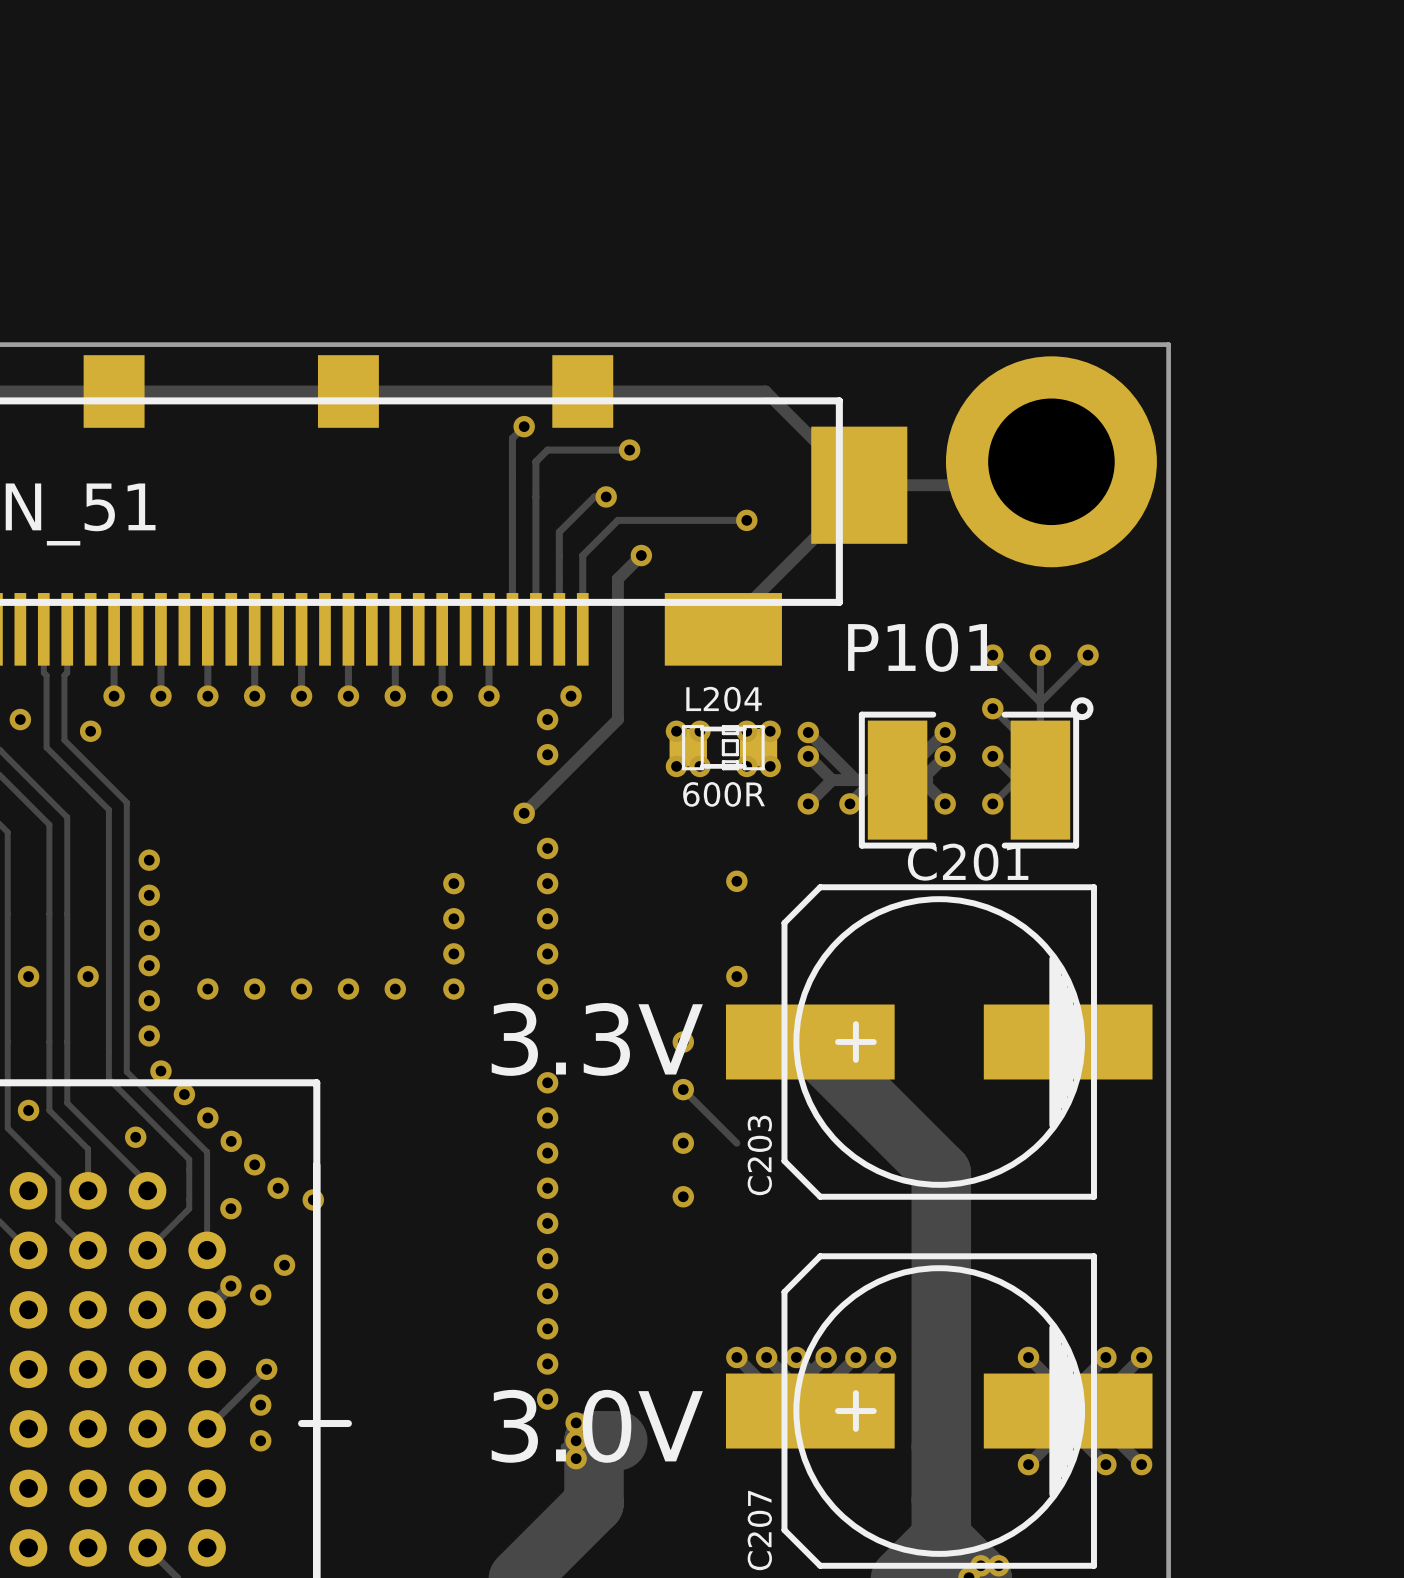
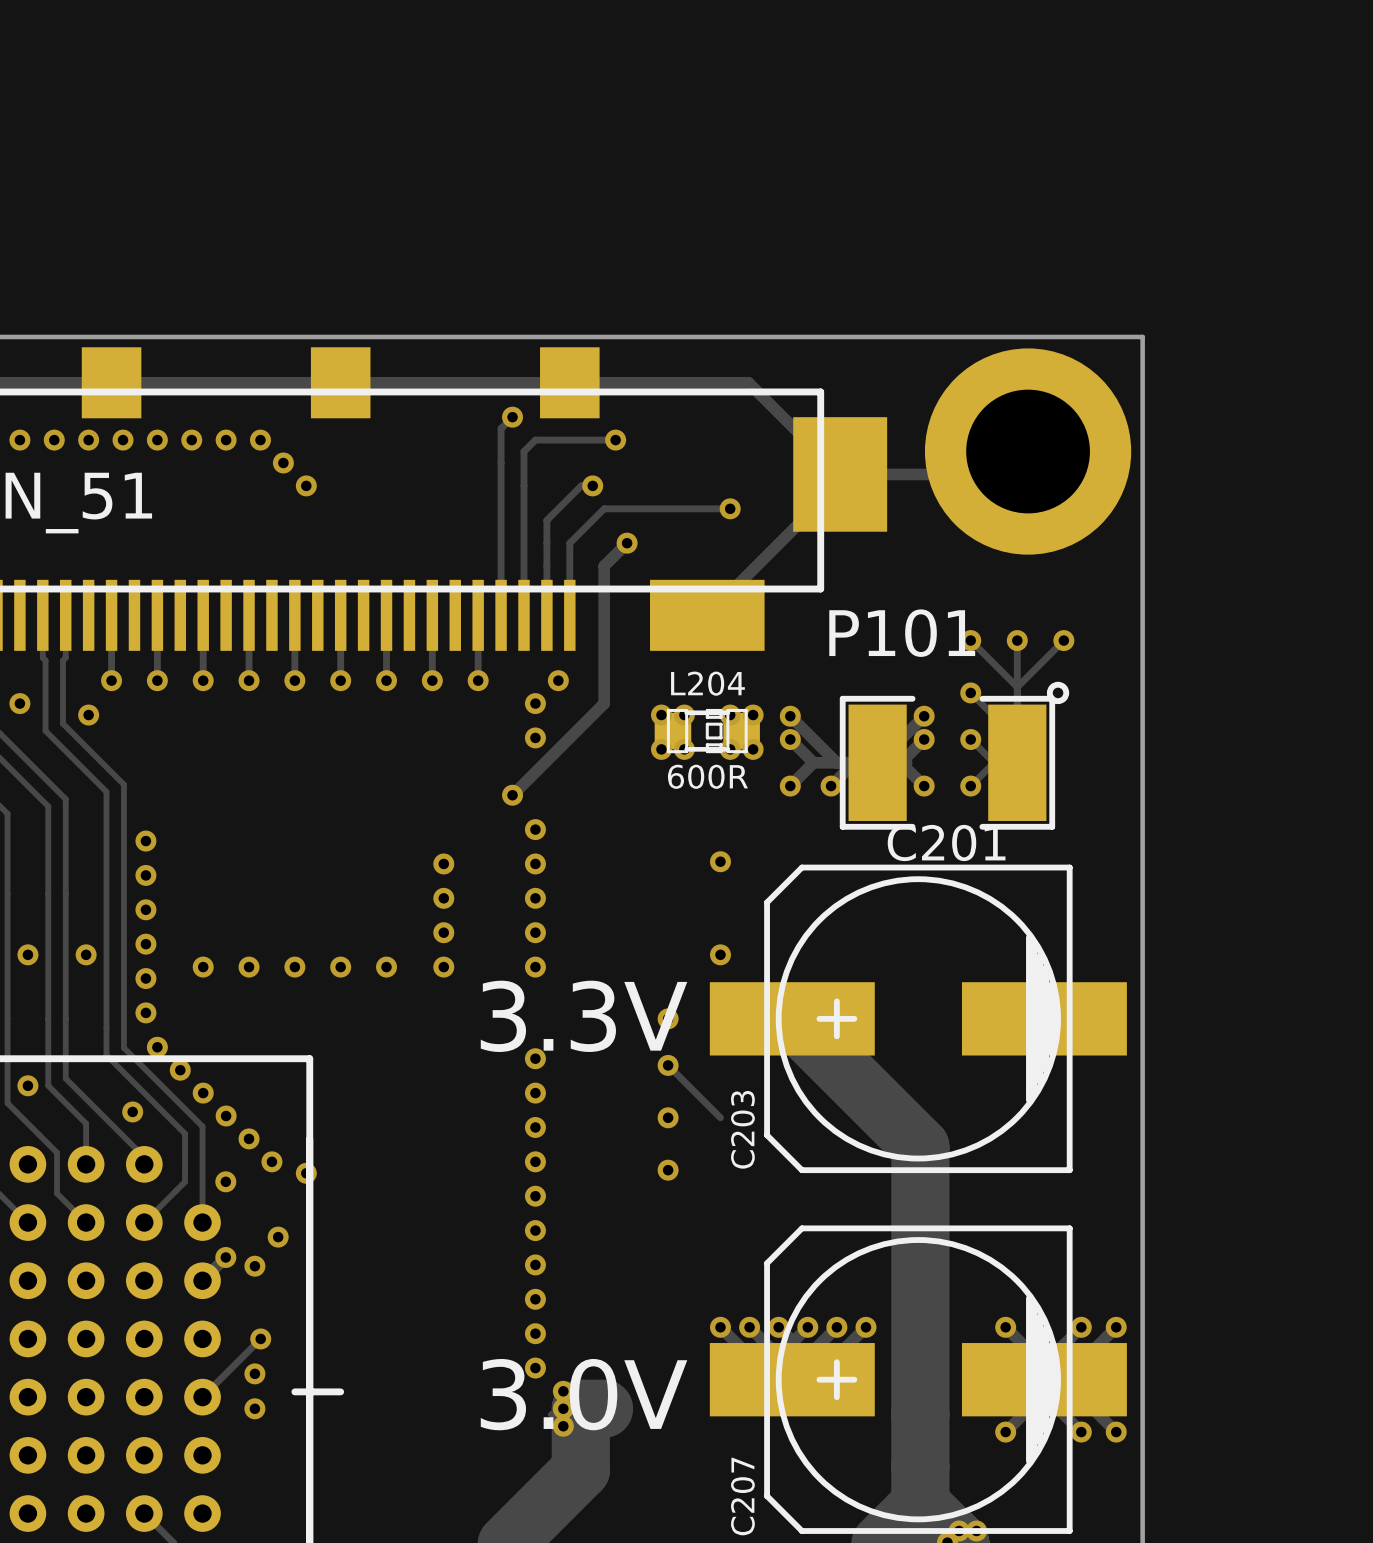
via: none -> (19, 440)
via: none -> (54, 440)
via: none -> (88, 440)
via: none -> (123, 440)
via: none -> (157, 440)
via: none -> (191, 440)
via: none -> (226, 440)
via: none -> (260, 440)
via: none -> (283, 462)
via: none -> (306, 485)

